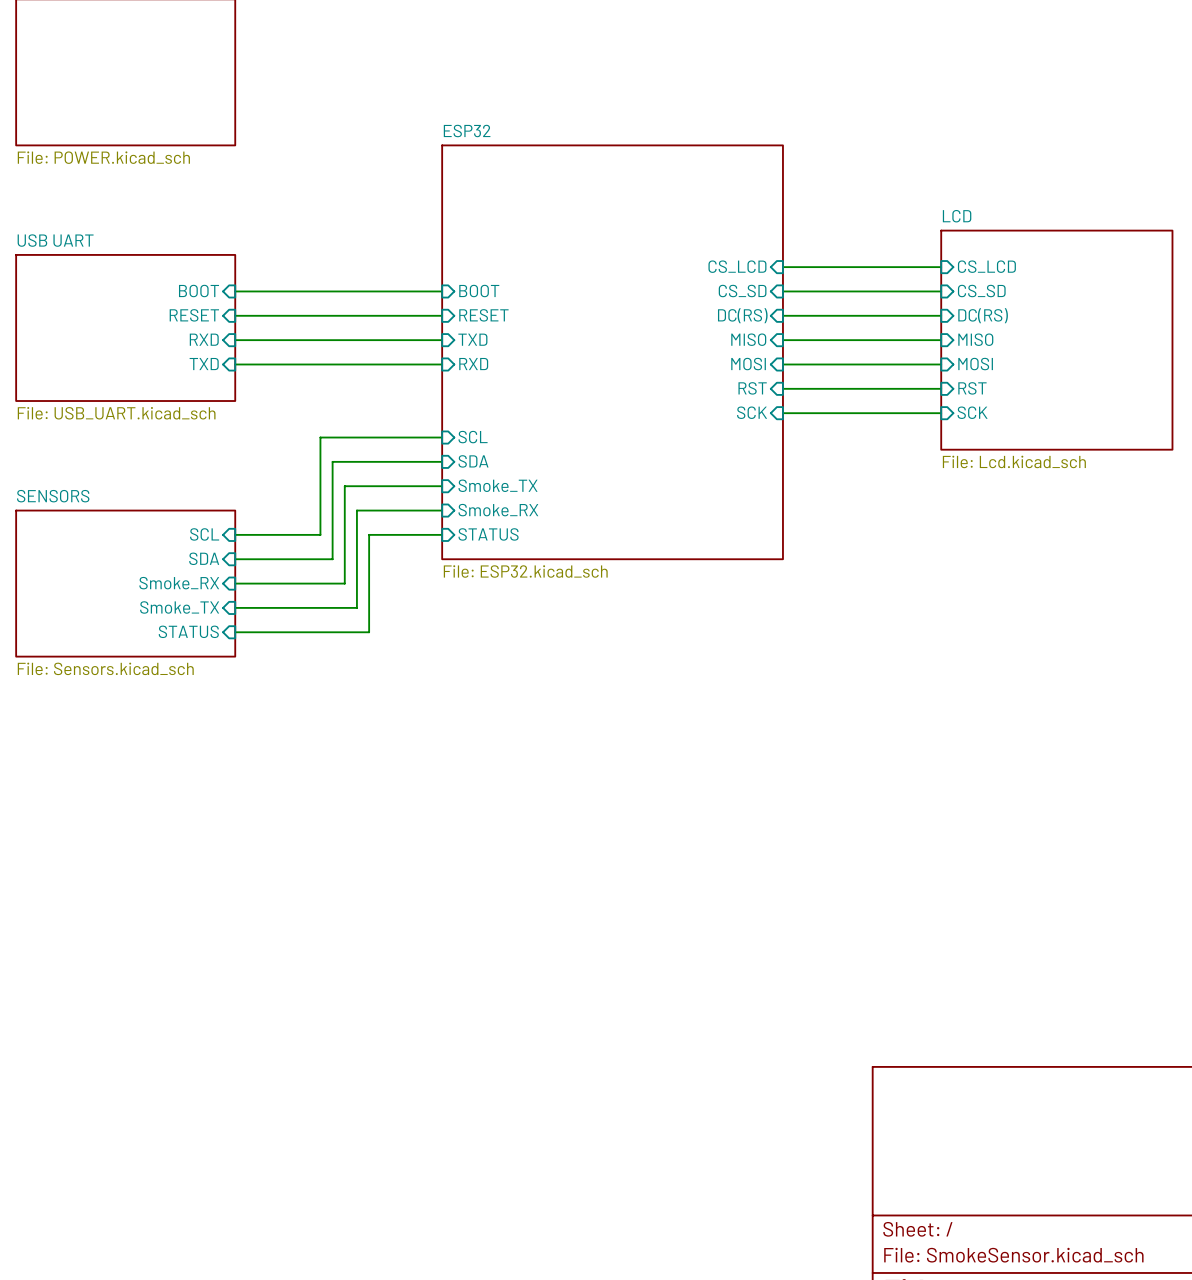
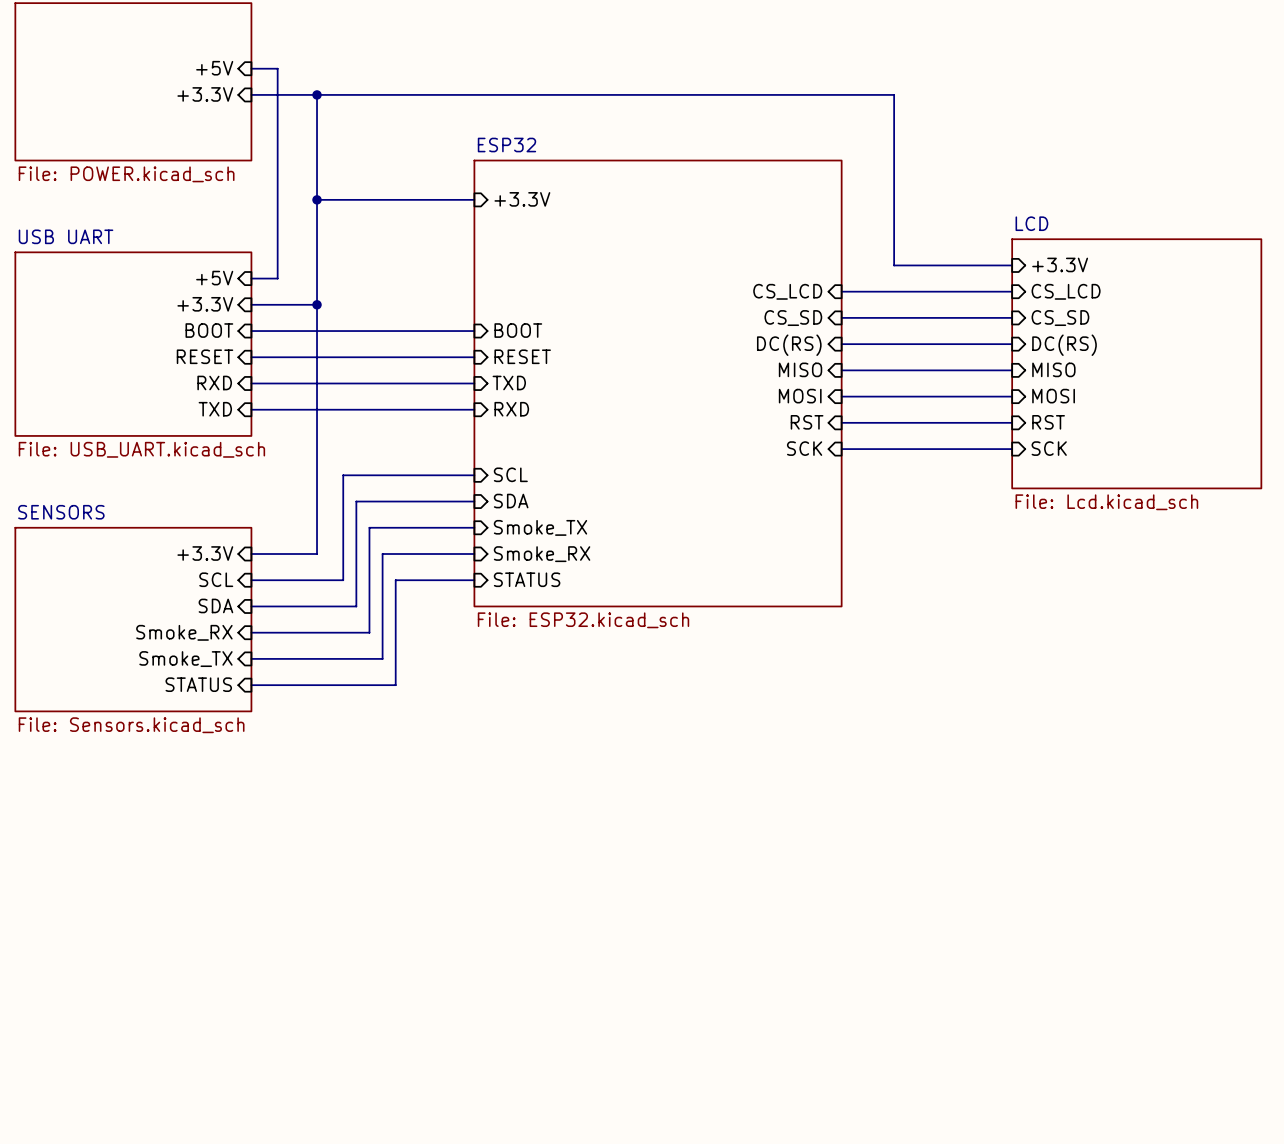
sheet pin: none -> +5V (214, 68)
wire: none -> (251, 68) (277, 68) (277, 278) (251, 278)
sheet pin: none -> +3.3V (205, 94)
wire: none -> (251, 94) (894, 94) (894, 265) (1012, 265)
wire: none -> (317, 94) (317, 554) (251, 554)
junction: none -> (317, 94)
wire: none -> (317, 199) (474, 199)
junction: none -> (317, 199)
sheet pin: none -> +3.3V (522, 199)
sheet LCD shape: [940, 229, 1174, 451] -> [1011, 238, 1263, 490]
sheet pin: none -> +3.3V (1060, 264)
sheet pin: none -> +5V (214, 278)
sheet pin: none -> +3.3V (205, 304)
wire: none -> (251, 304) (317, 304)
junction: none -> (317, 304)
sheet pin position: BOOT (199, 291) -> BOOT (209, 330)
wire: (235, 291) (442, 291) -> (251, 331) (474, 331)
sheet pin position: BOOT (479, 291) -> BOOT (518, 330)
sheet USB UART: none -> File: USB_UART.kicad_sch (133, 344)
sheet pin position: RESET (194, 315) -> RESET (205, 356)
wire: (235, 315) (442, 315) -> (251, 357) (474, 357)
sheet pin position: RESET (483, 315) -> RESET (522, 356)
sheet USB UART: File: USB_UART.kicad_sch (125, 327) -> none
sheet pin position: RXD (204, 339) -> RXD (214, 383)
sheet pin position: TXD (472, 339) -> TXD (509, 383)
wire: (235, 340) (442, 340) -> (251, 383) (474, 383)
sheet pin position: TXD (204, 364) -> TXD (215, 409)
wire: (235, 364) (442, 364) -> (251, 409) (474, 409)
sheet pin position: RXD (473, 364) -> RXD (511, 409)
sheet pin: none -> +3.3V (205, 553)
sheet SENSORS: none -> File: Sensors.kicad_sch (133, 619)
sheet SENSORS: File: Sensors.kicad_sch (125, 583) -> none

